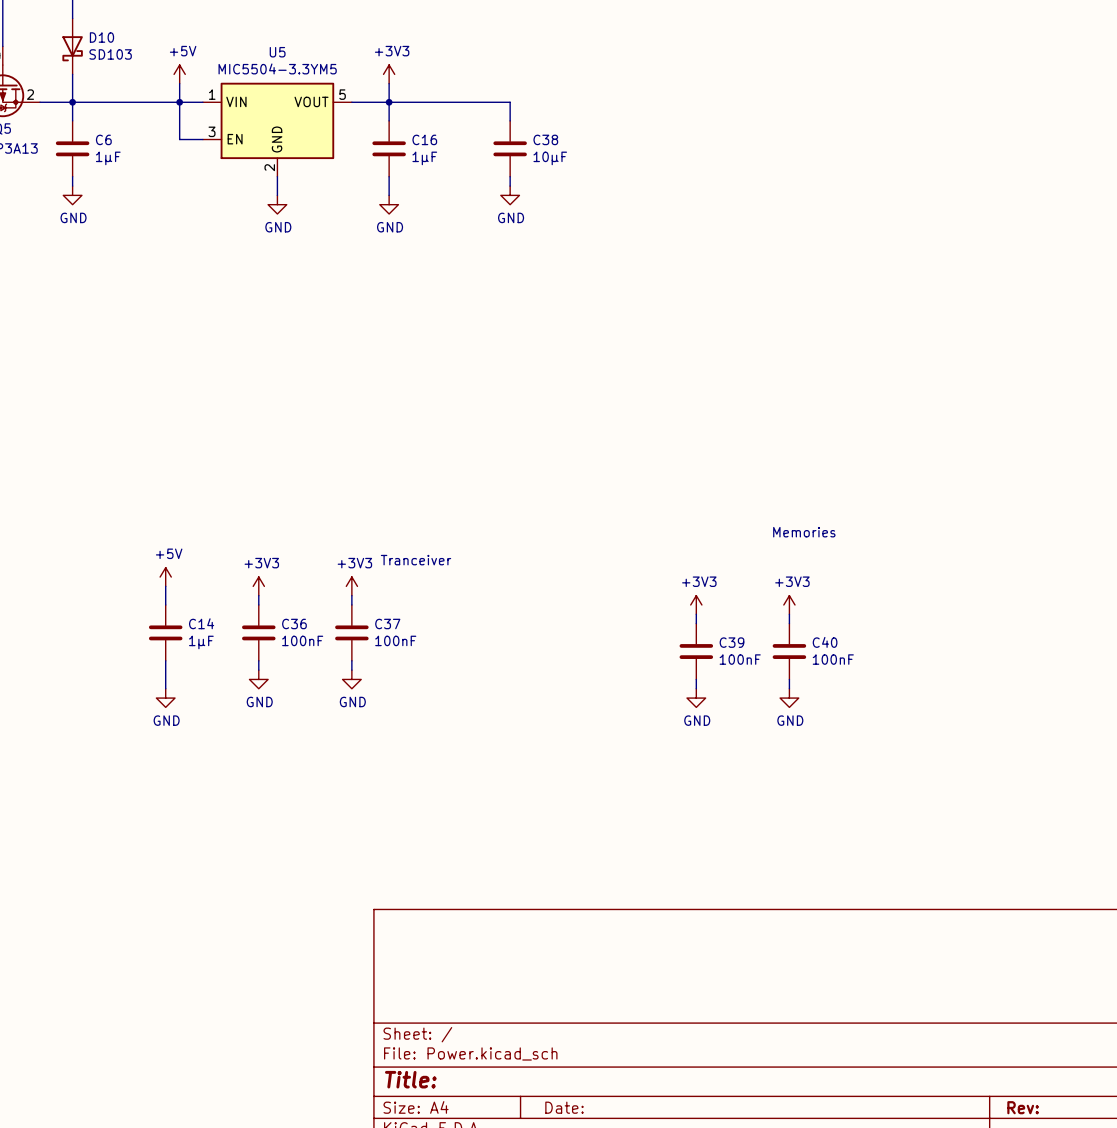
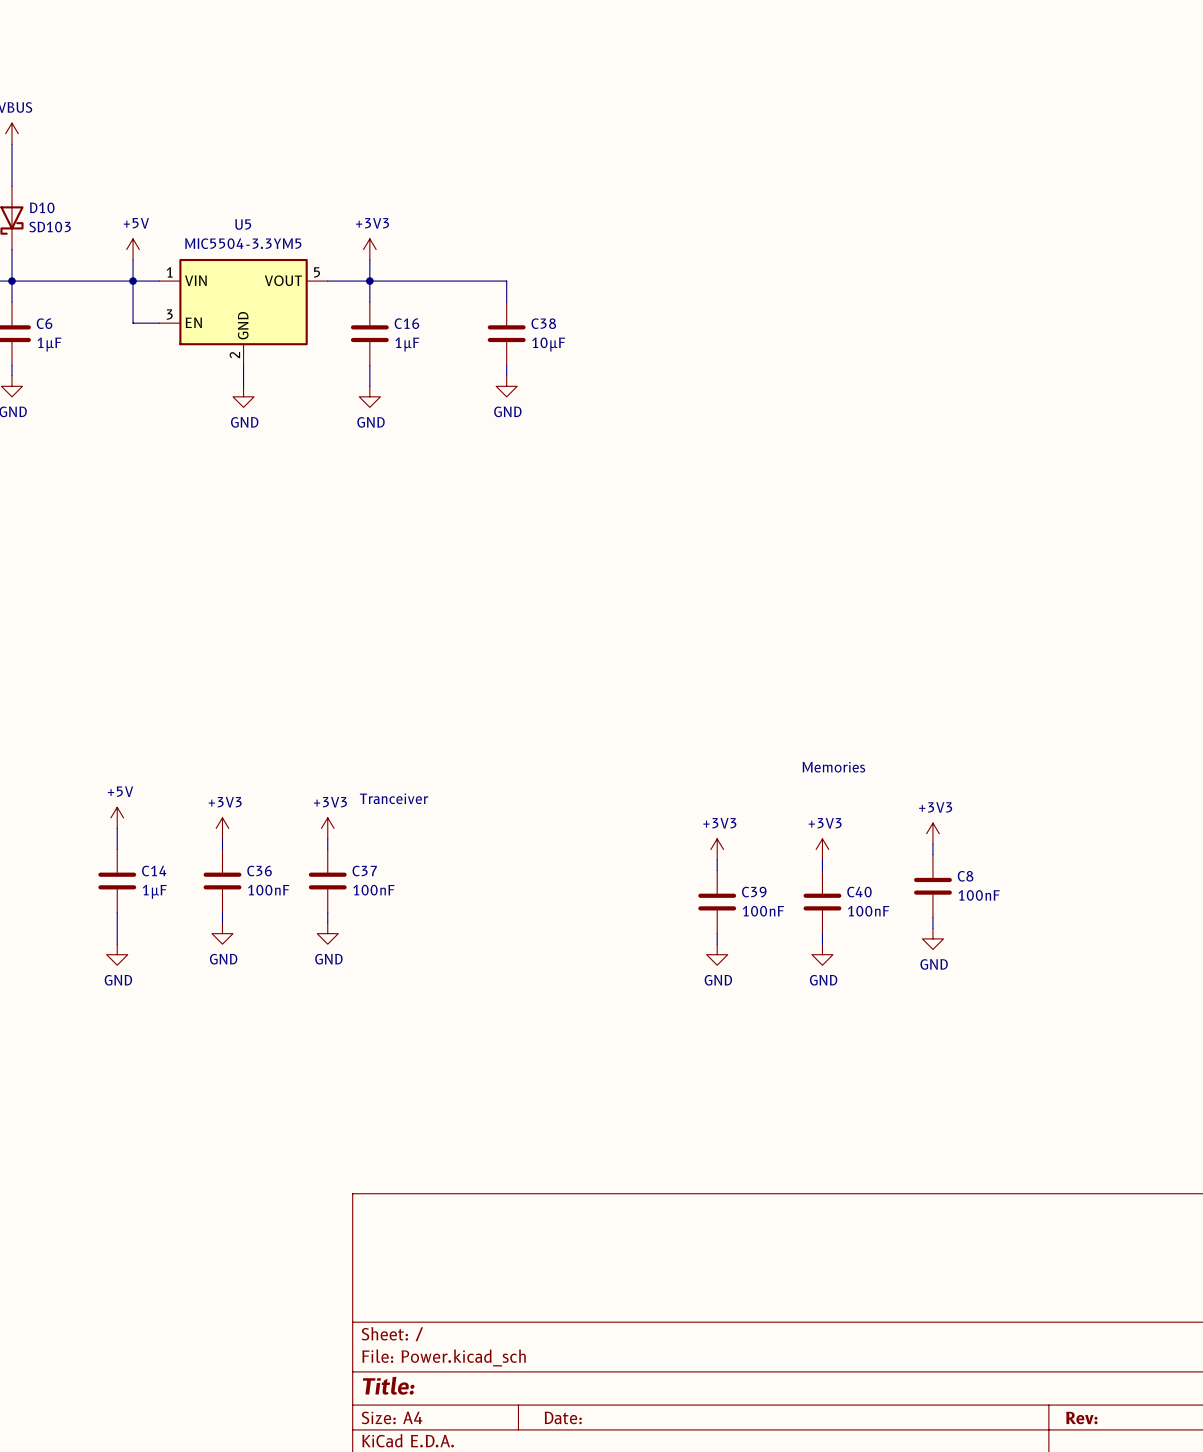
power symbol: none -> +3V3 (932, 833)
wire: none -> (932, 844) (932, 854)
C8: none -> 100nF (932, 886)
wire: none -> (932, 917) (932, 928)
power symbol: none -> GND (932, 938)

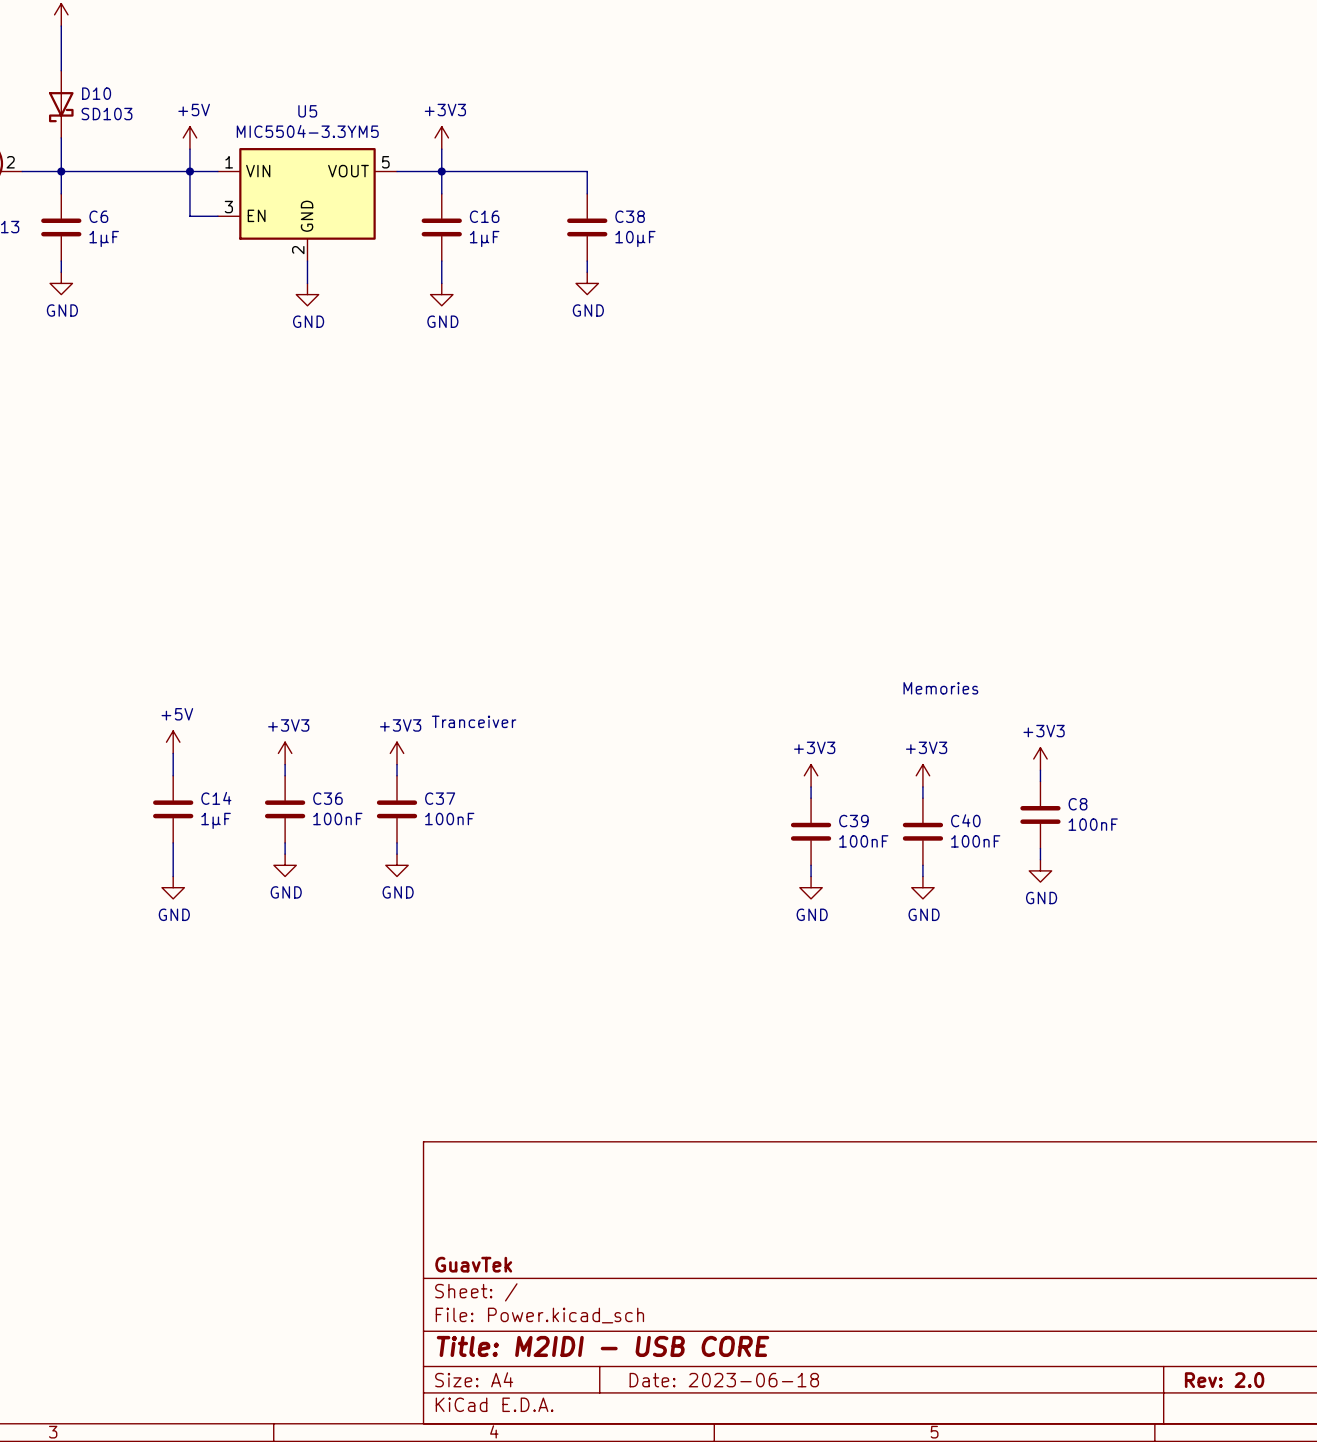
title block: none -> GuavTek (473, 1264)
title block: Title: (388, 1385) -> Title: M2IDI - USB CORE (603, 1346)
title block: Date: (563, 1417) -> Date: 2023-06-18 (724, 1380)
title block: Rev: (1081, 1418) -> Rev: 2.0 (1224, 1380)

